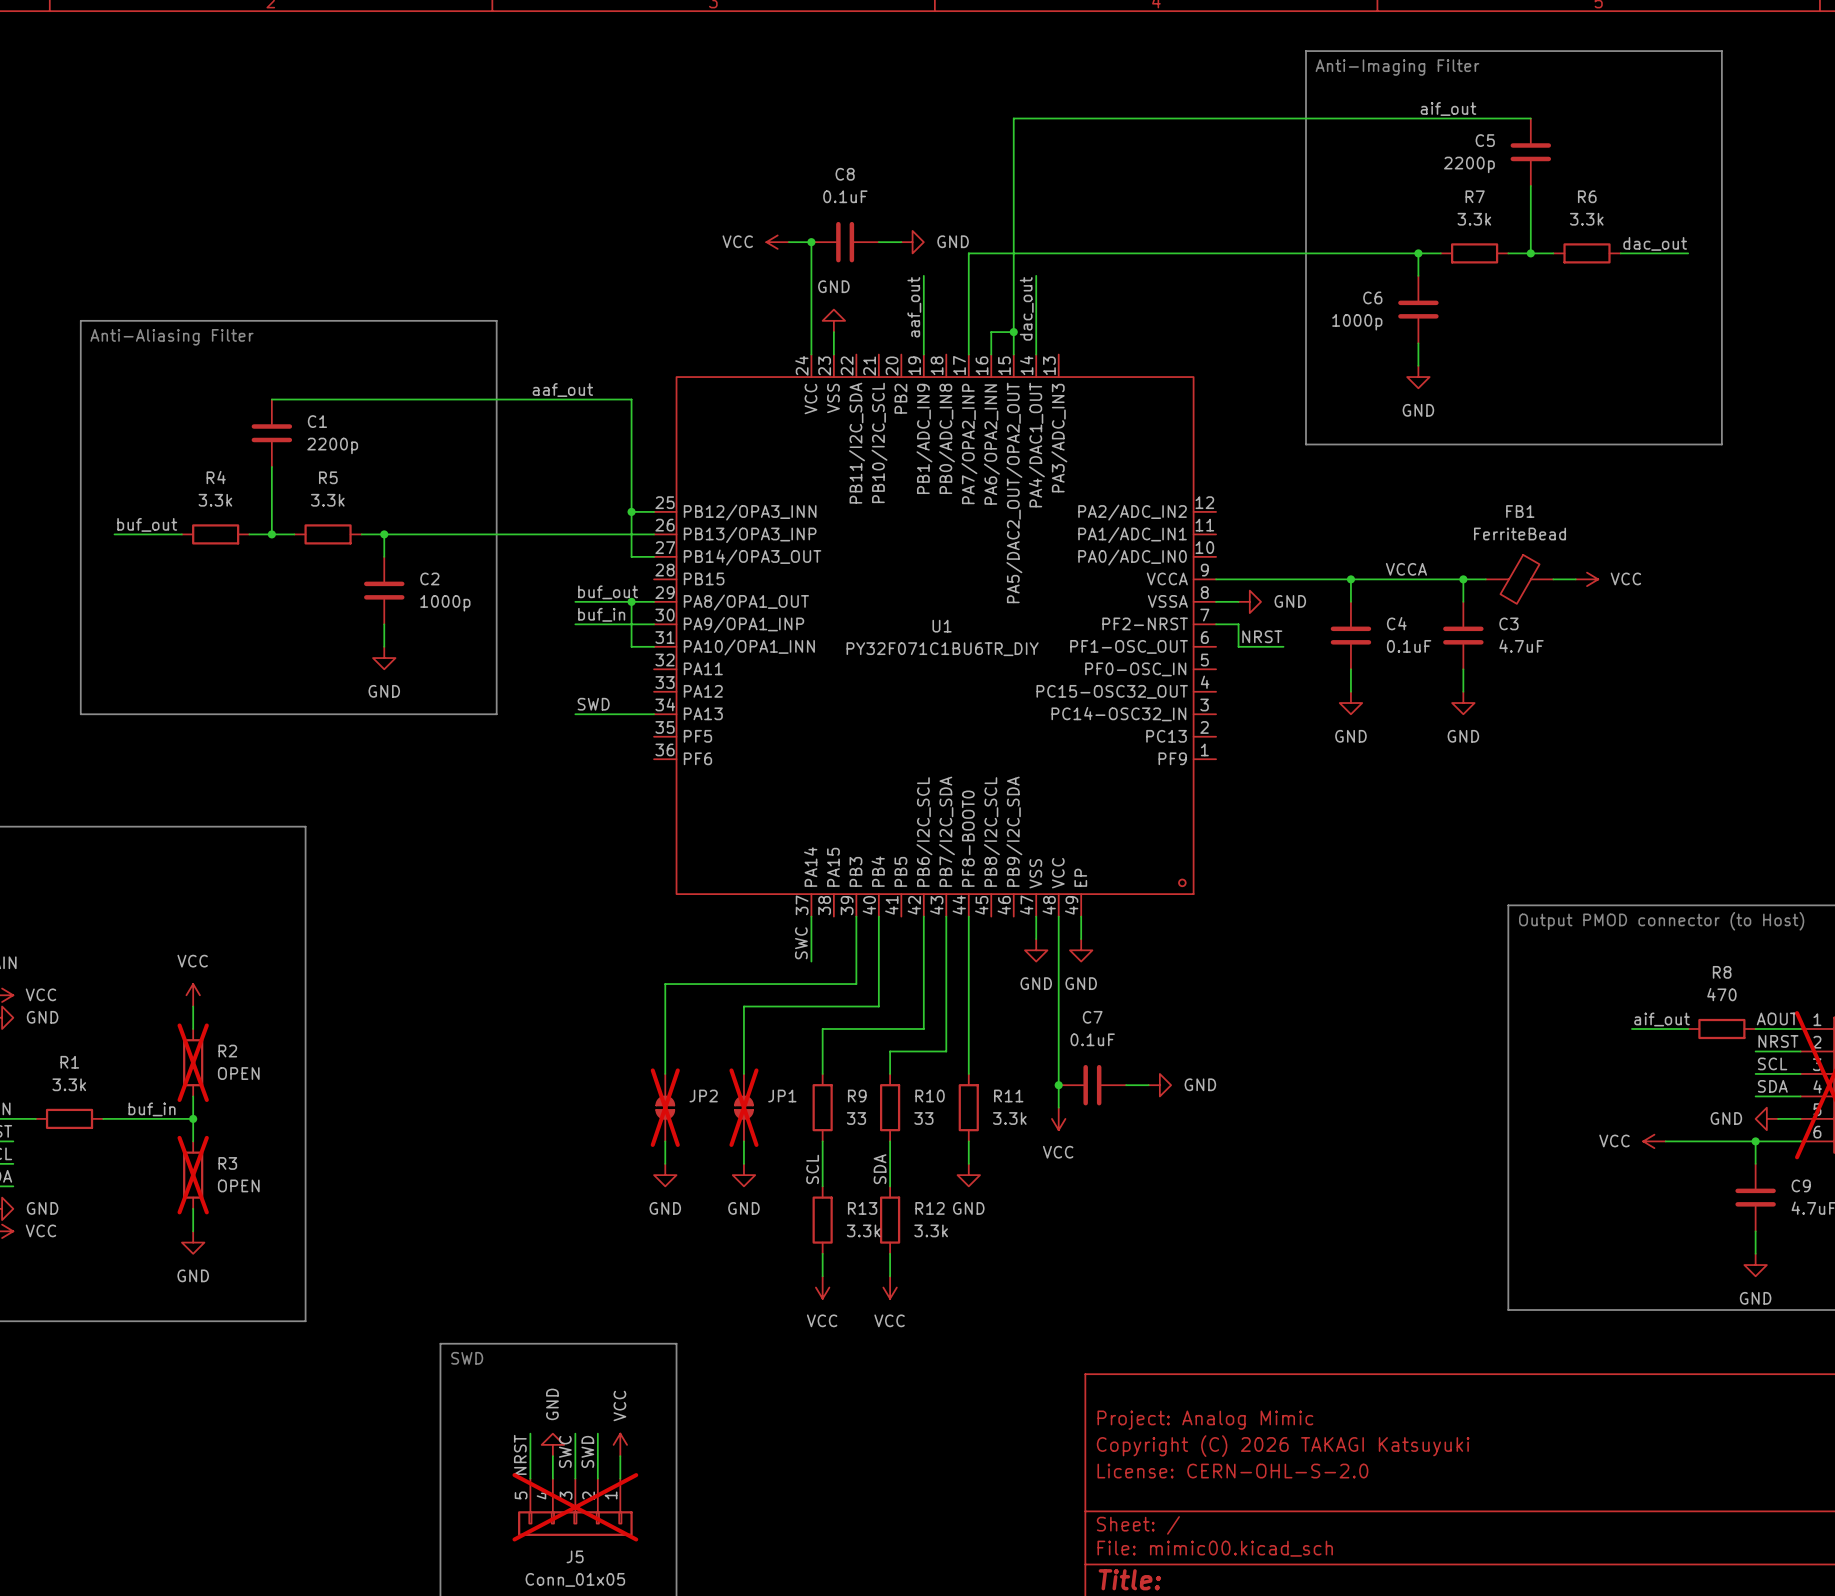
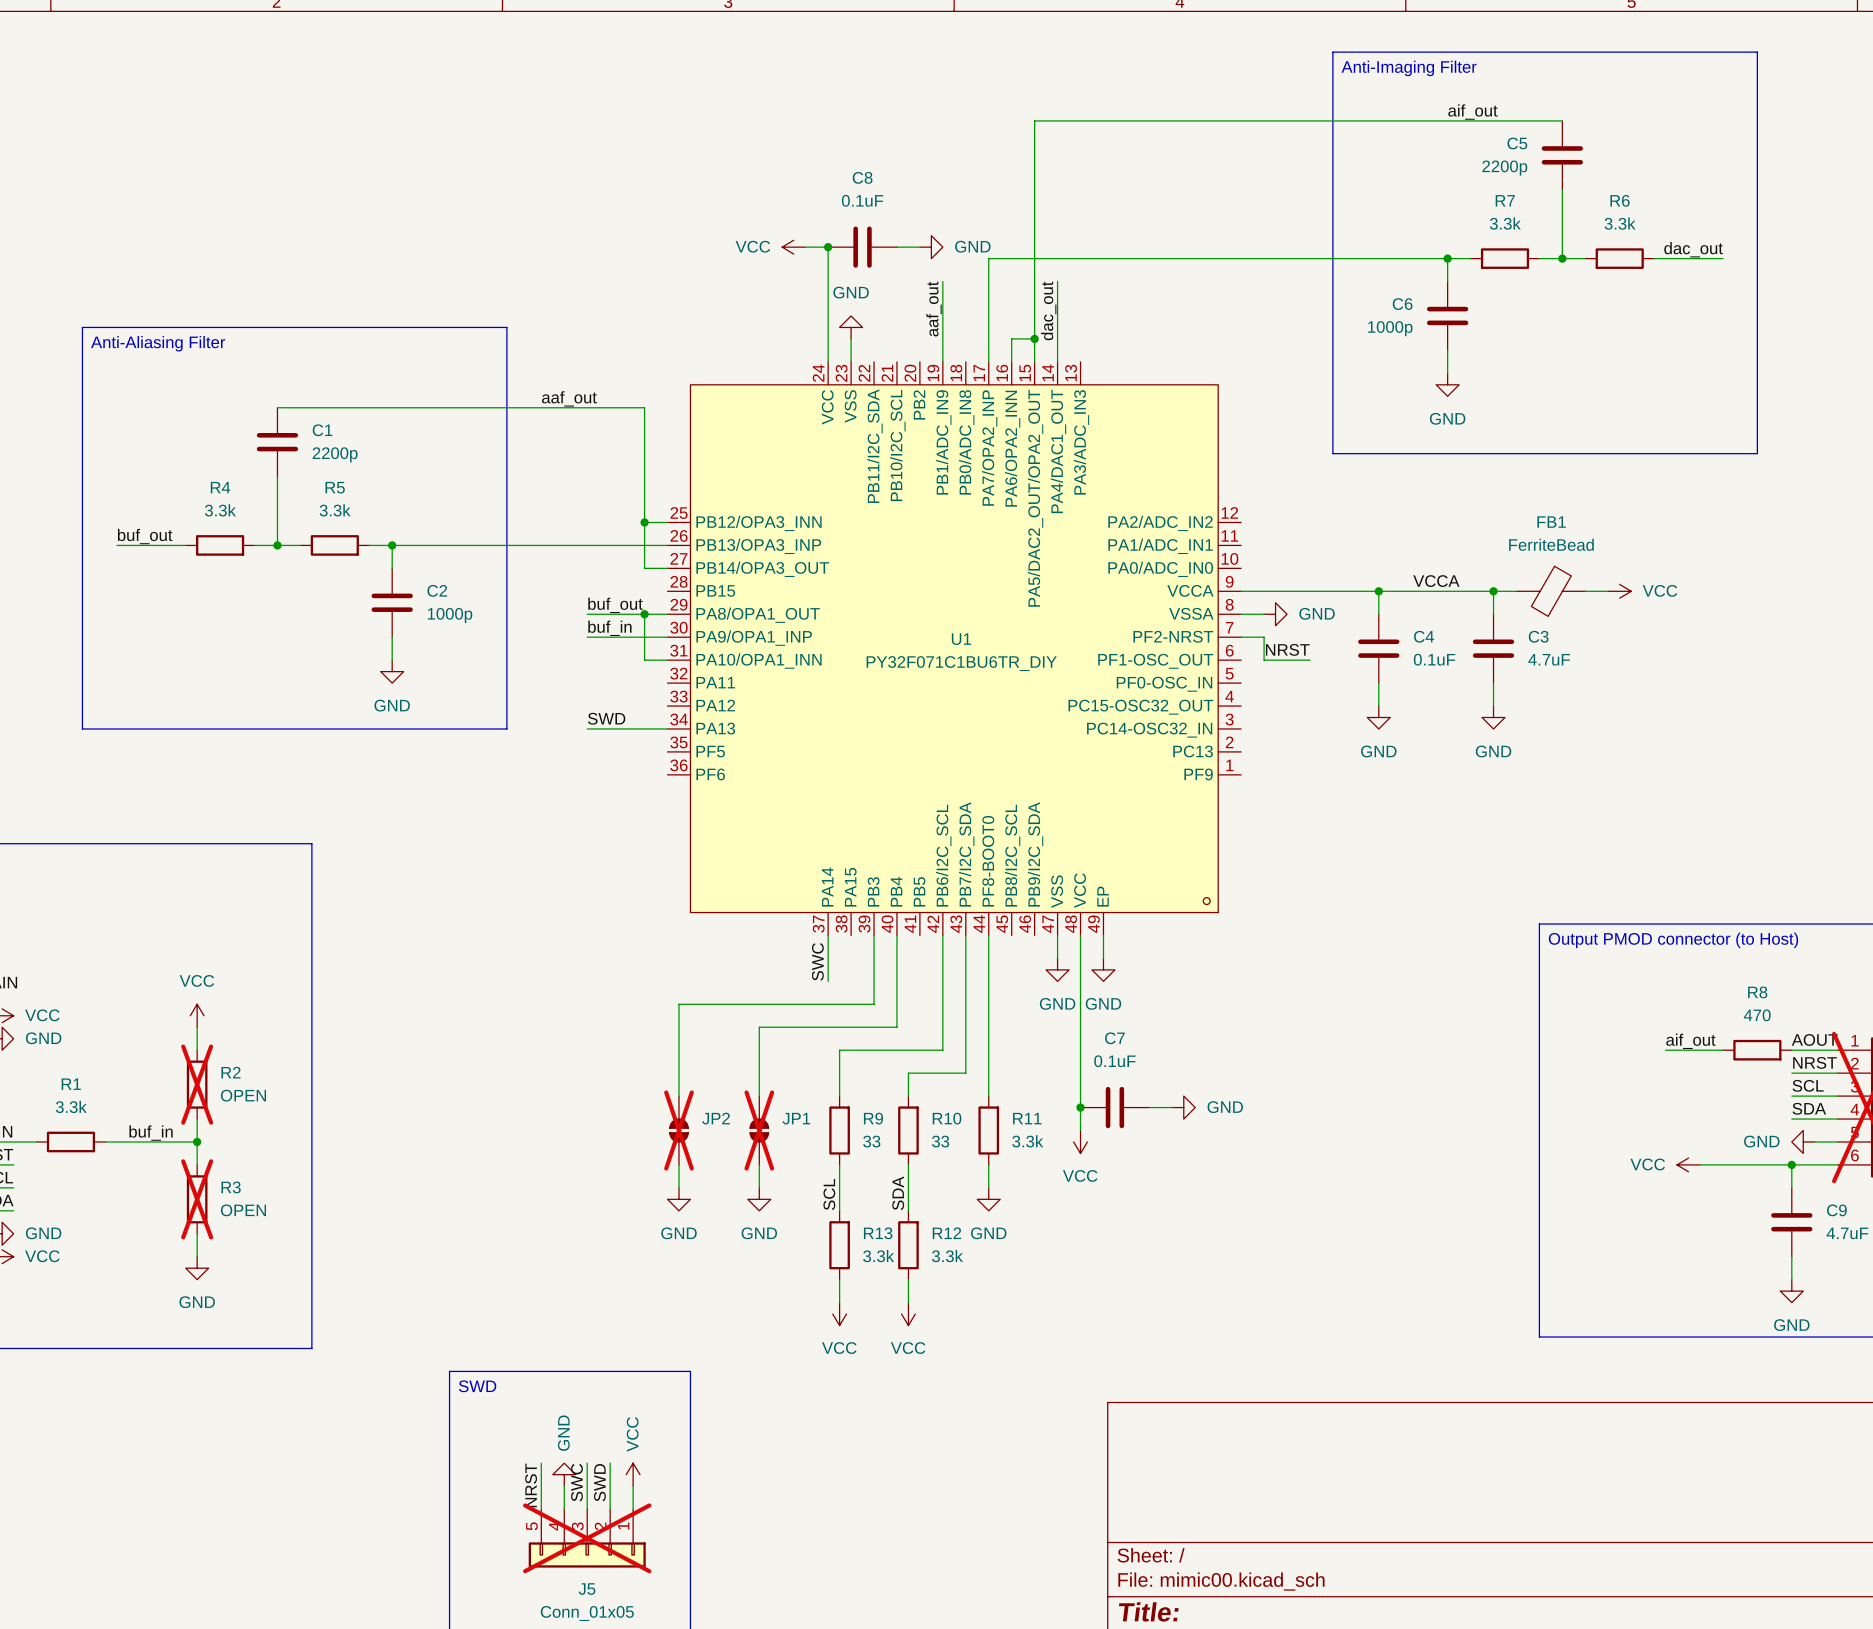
title block: Project: Analog Mimic (1205, 1420) -> none
title block: Copyright (C) 2026 TAKAGI Katsuyuki (1283, 1446) -> none
title block: License: CERN-OHL-S-2.0 (1232, 1471) -> none

